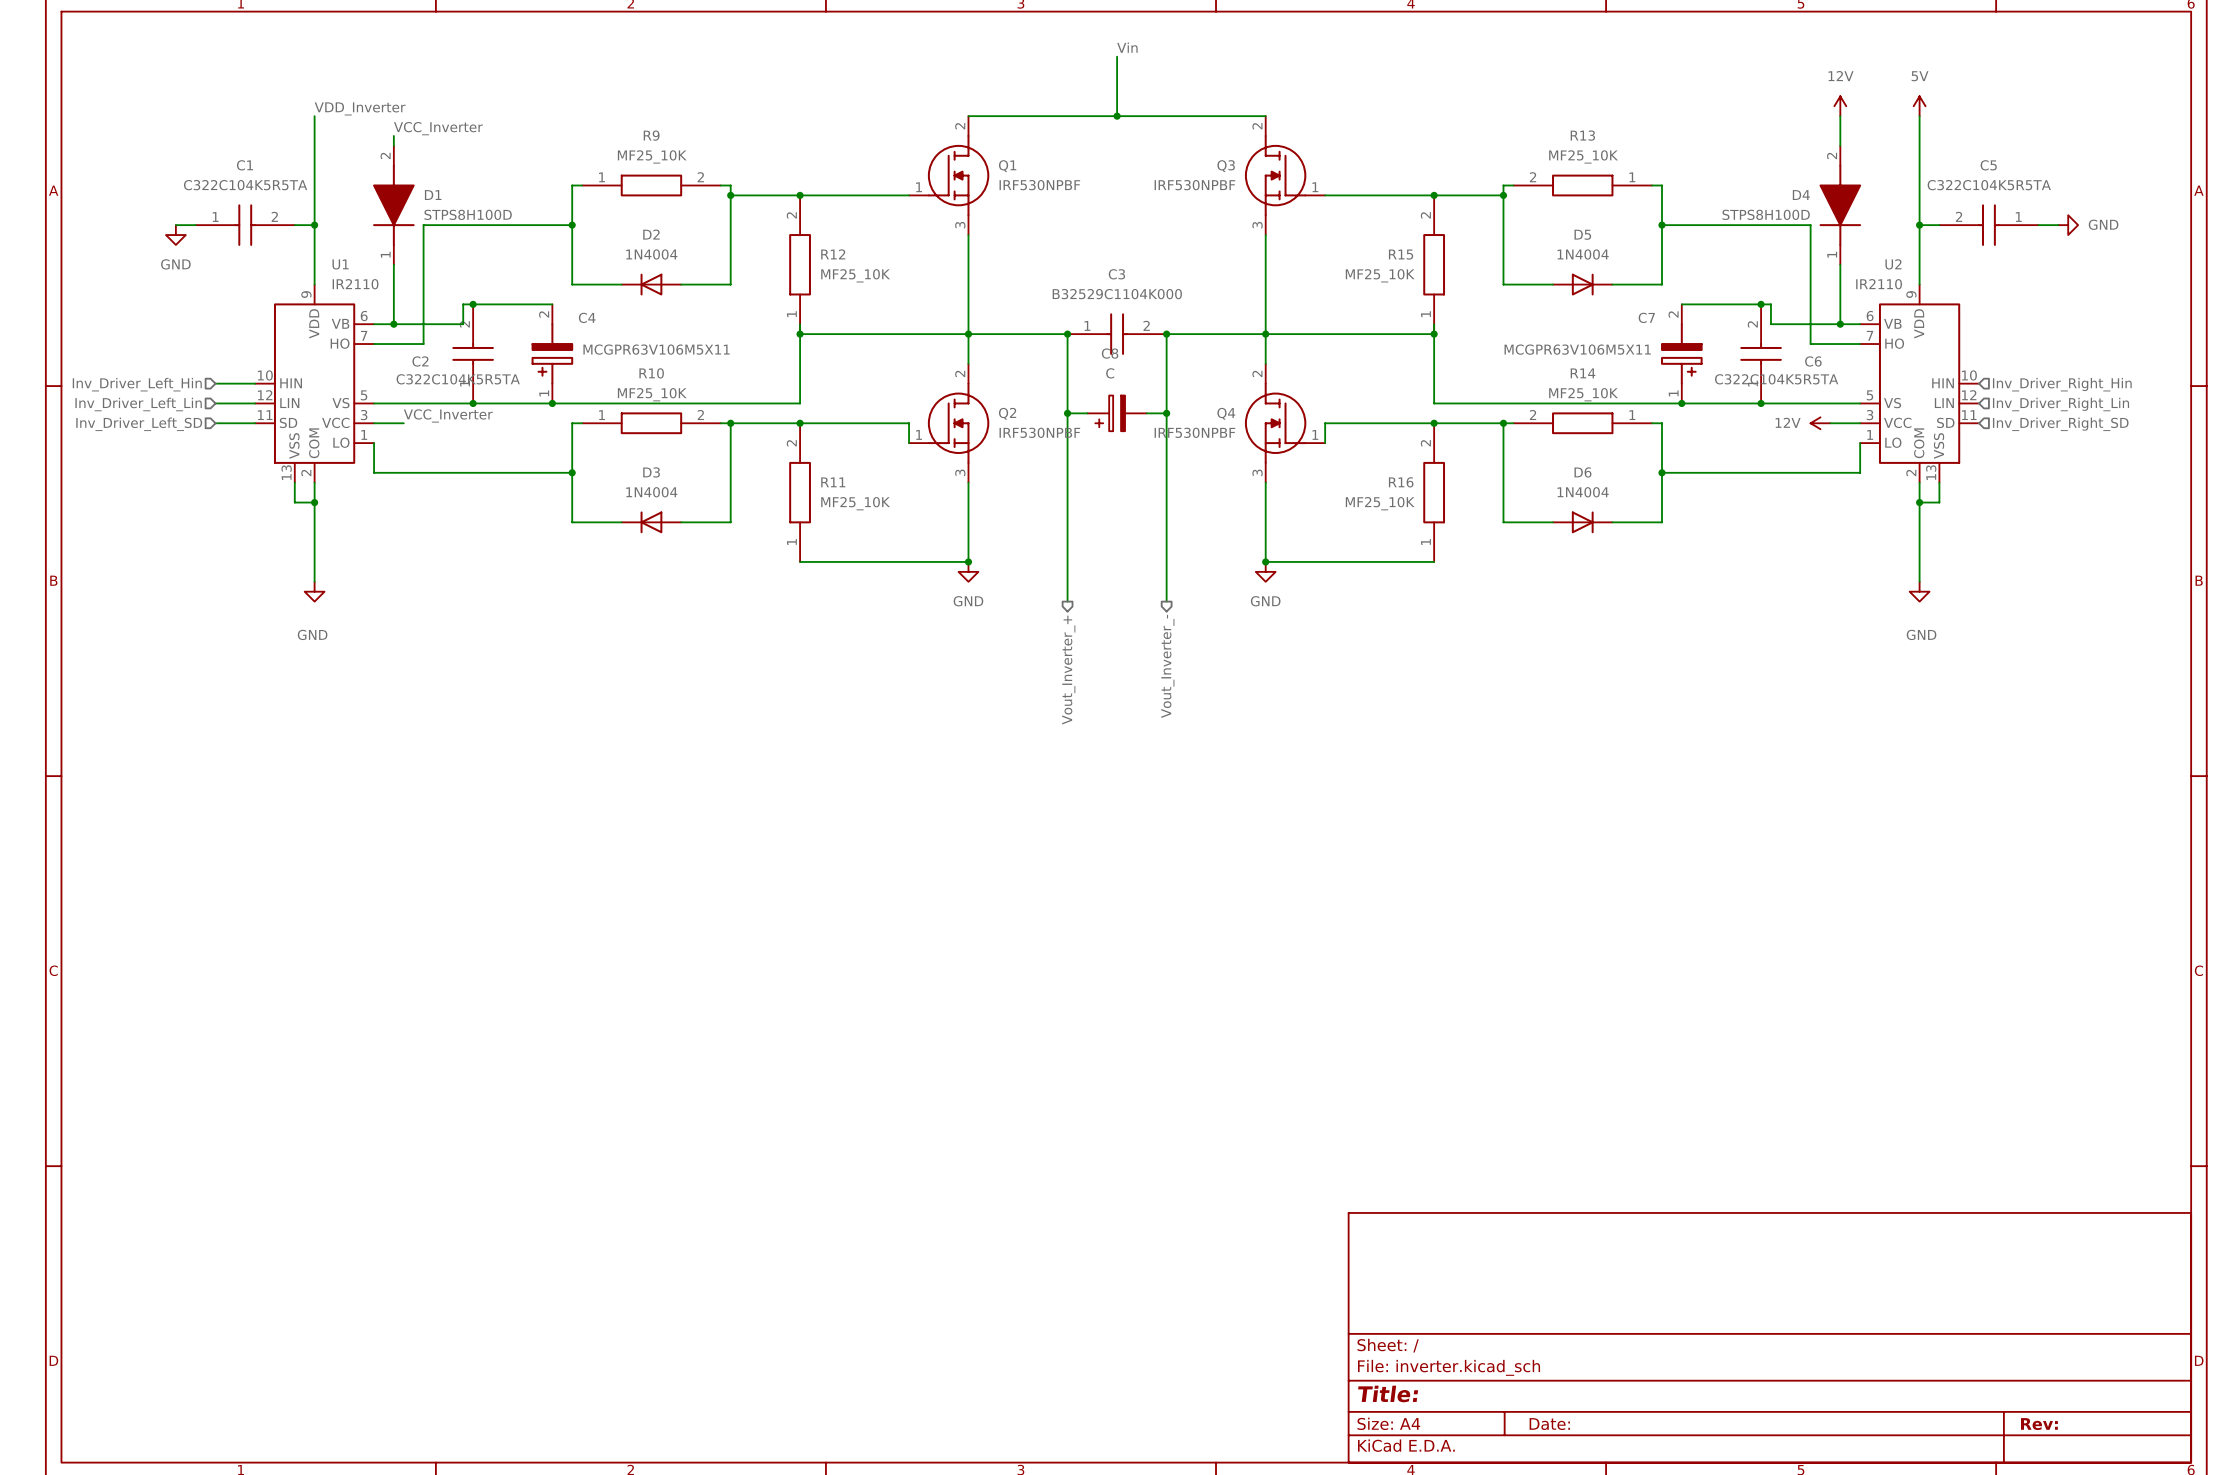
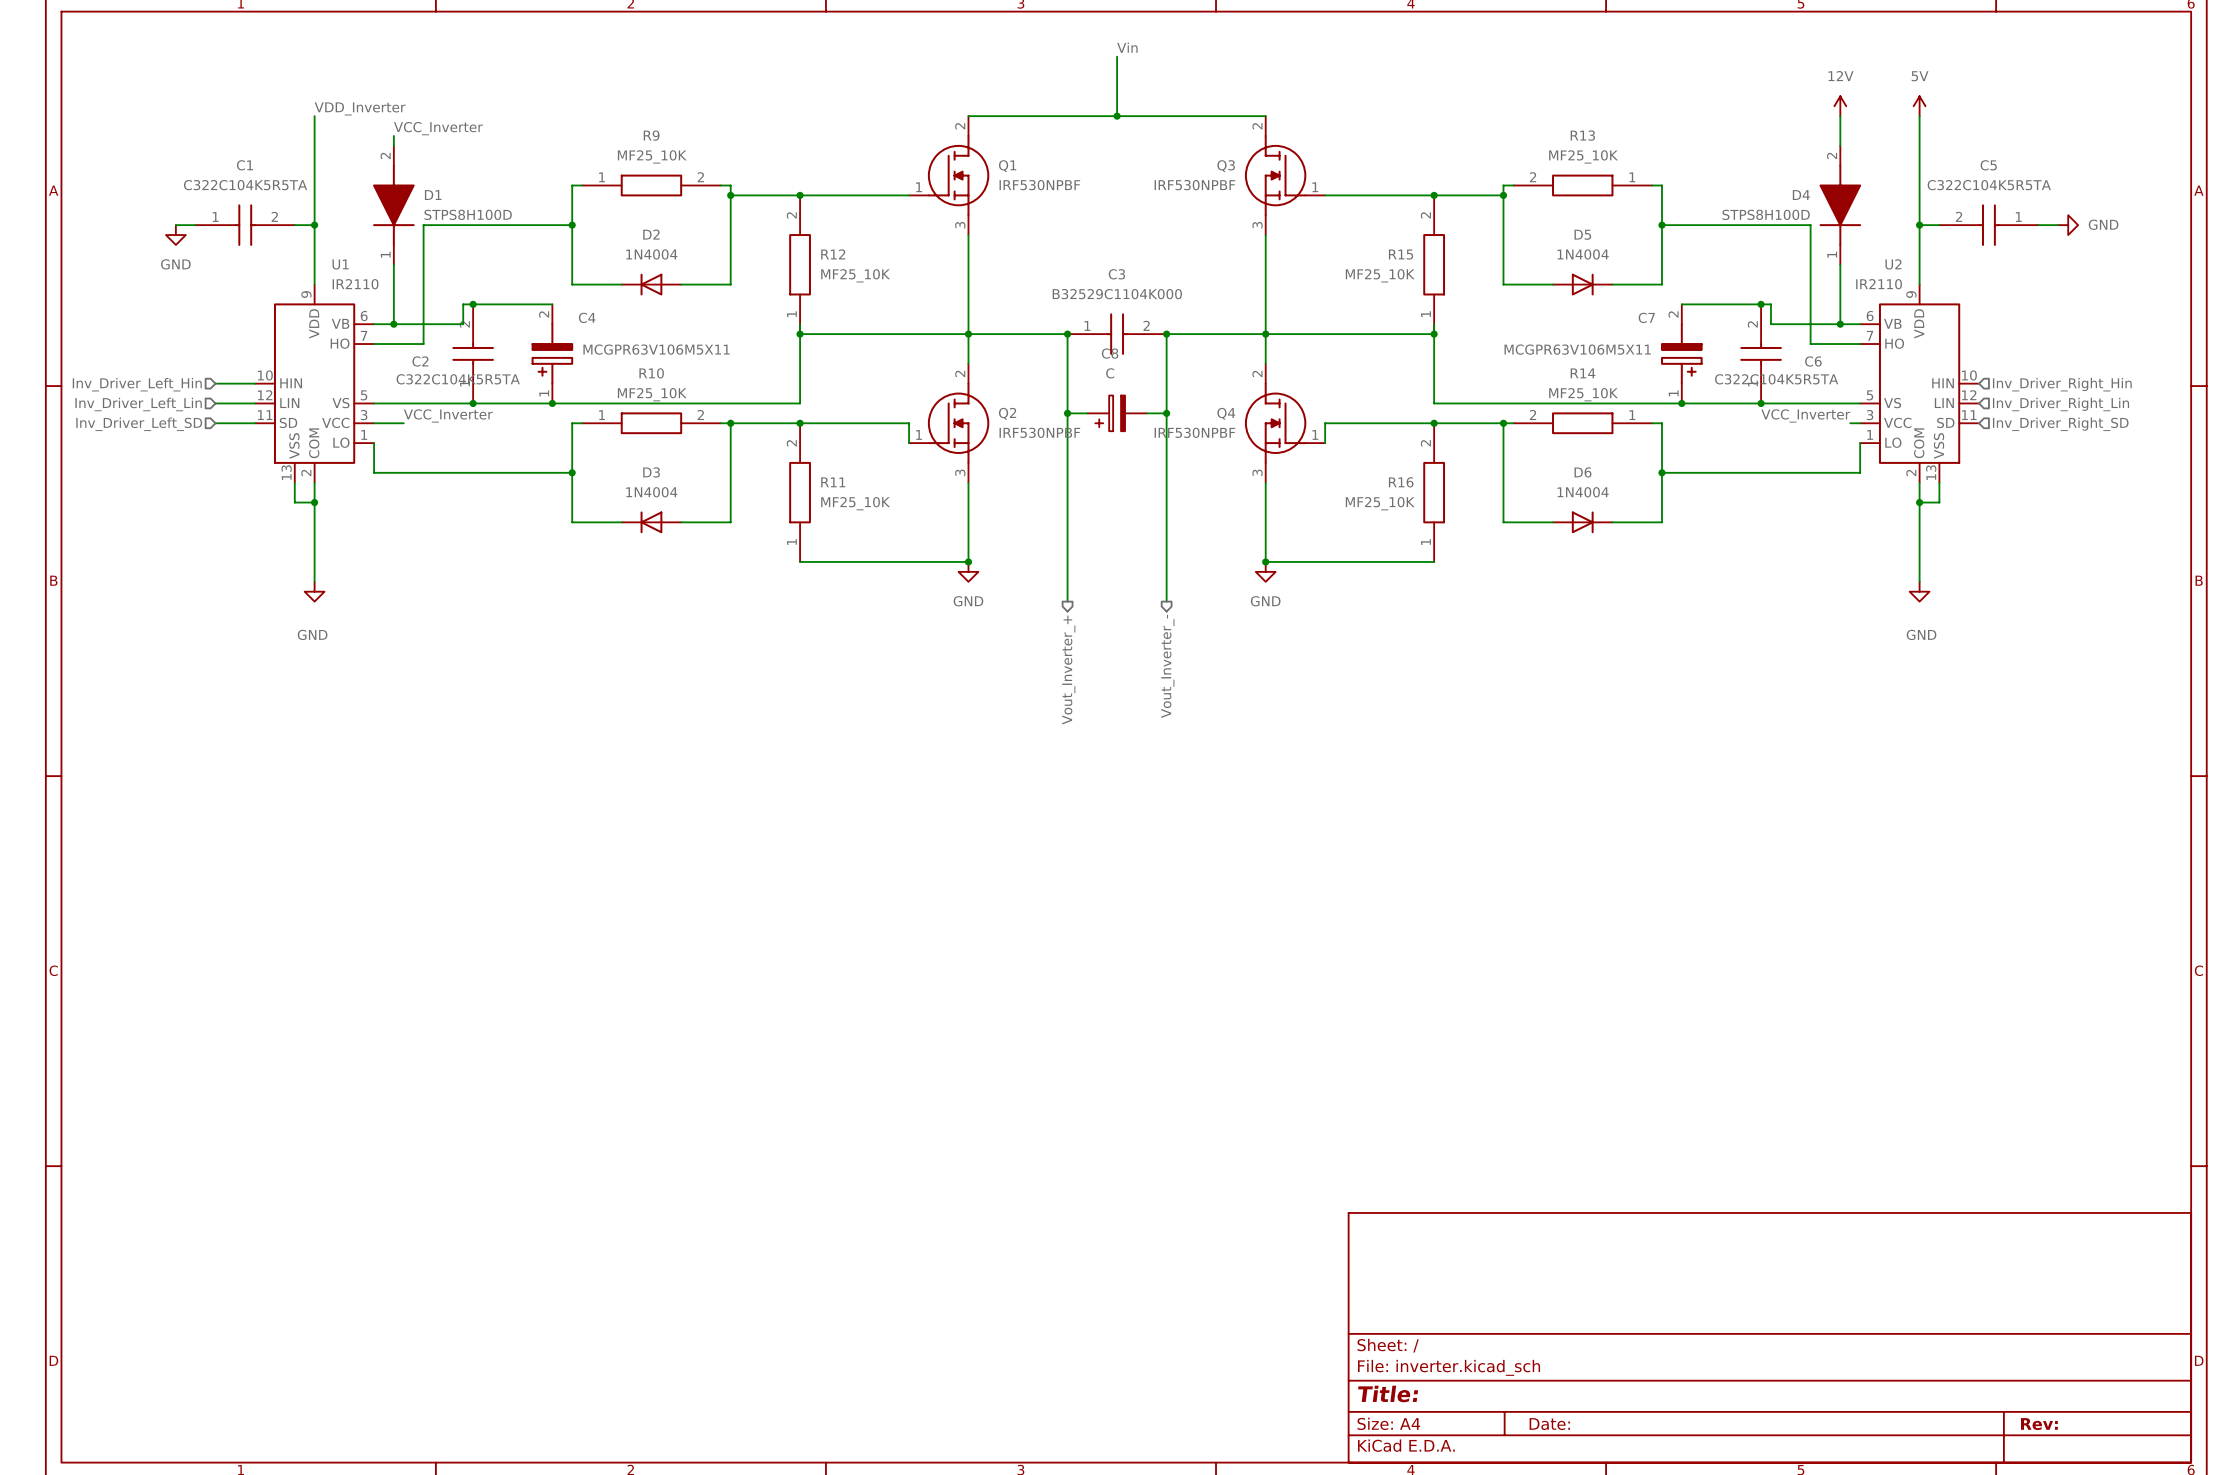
label: none -> VCC_Inverter (1805, 415)
power symbol: 12V (1820, 423) -> none
wire: (1830, 423) (1850, 423) -> none

